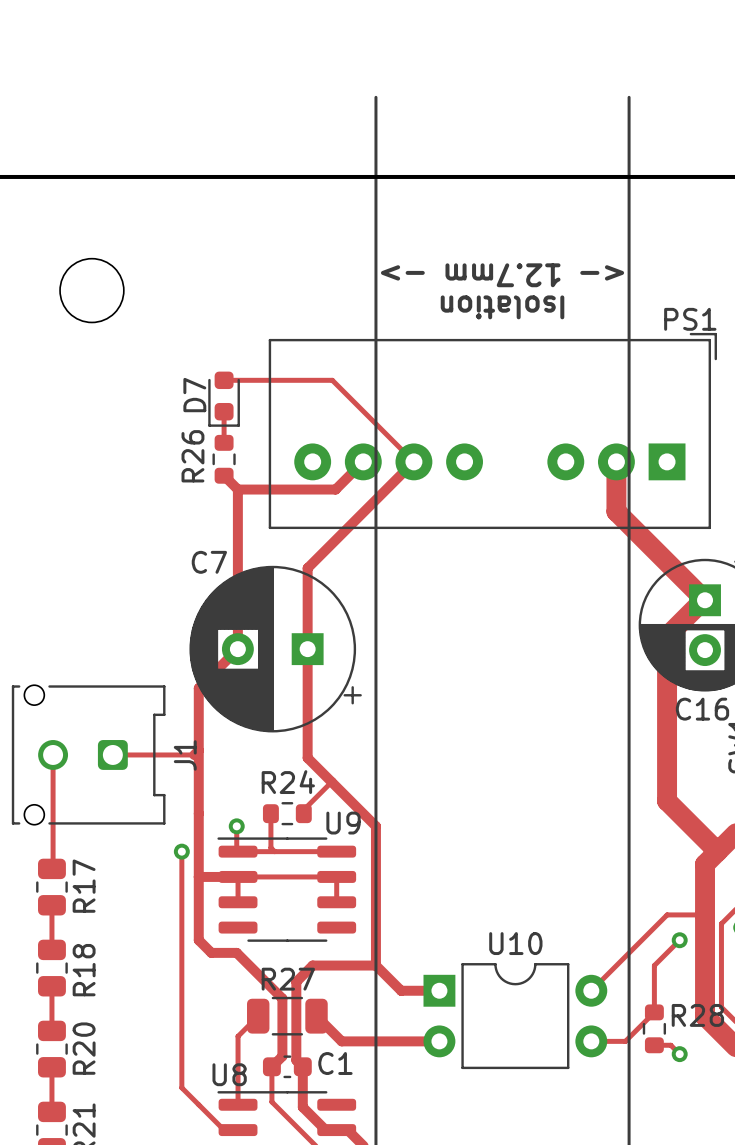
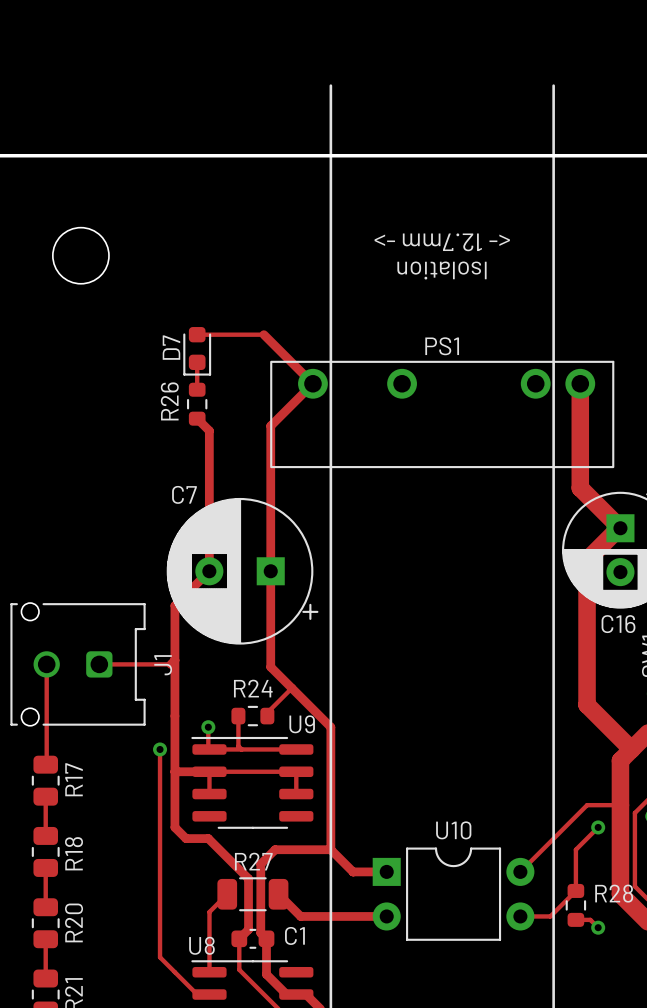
PS1 name position: PS1 (690, 319) -> PS1 (442, 346)
PS1 footprint: [268, 332, 717, 530] -> [270, 360, 615, 469]
track: (299, 380) (332, 380) (413, 461) (307, 568) -> (263, 334) (312, 383) (270, 425) (270, 500)
track: (363, 461) (335, 489) (237, 489) -> none
track: (616, 461) (616, 511) (659, 554) -> (580, 383) (580, 488)

